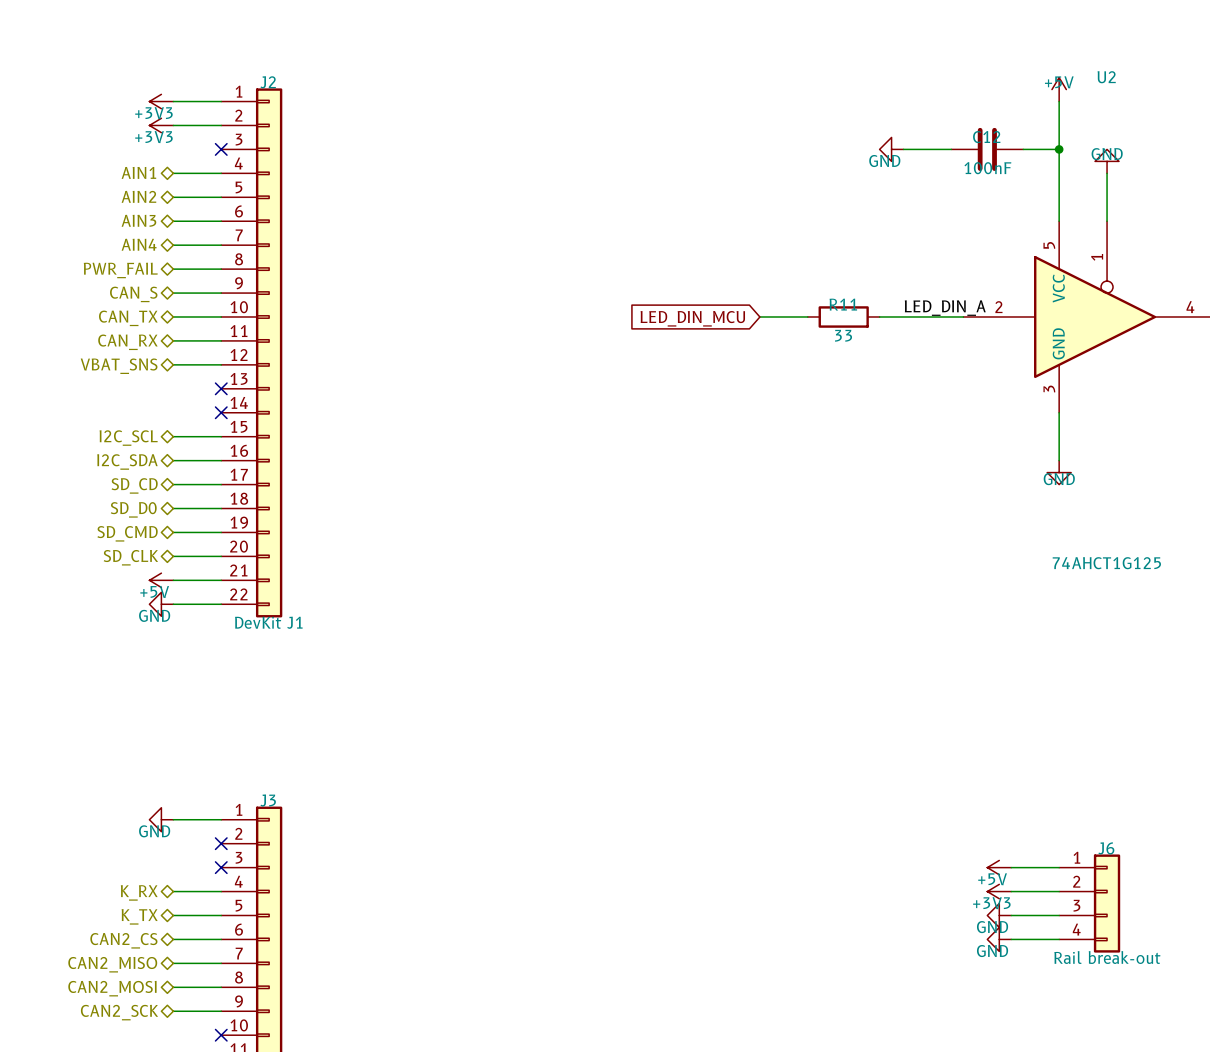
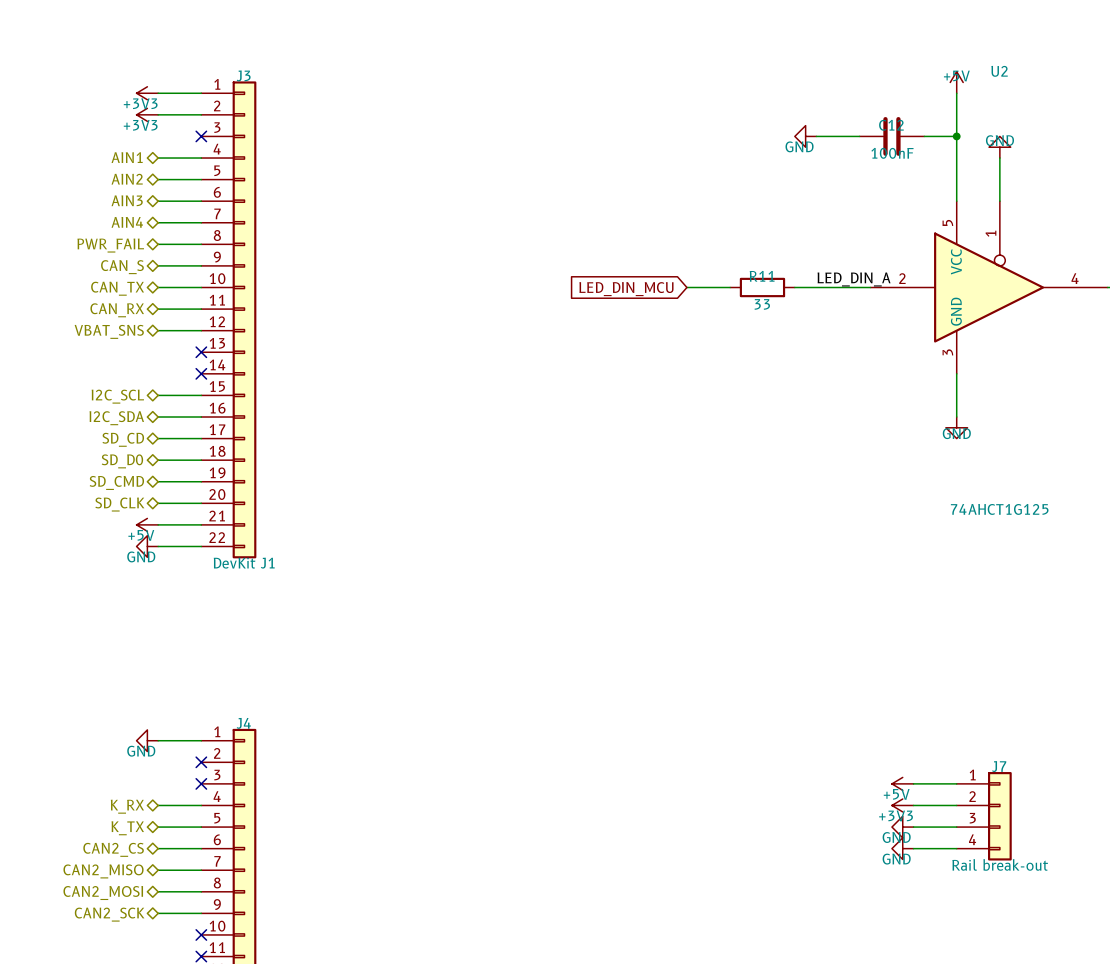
J2 name: J2 (268, 82) -> J3 (243, 75)
J3 name: J3 (268, 800) -> J4 (243, 723)
J6 name: J6 (1106, 848) -> J7 (999, 766)

